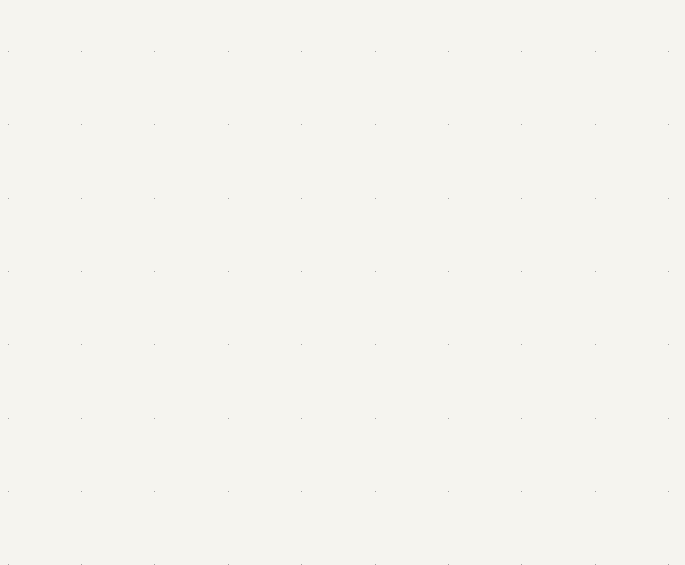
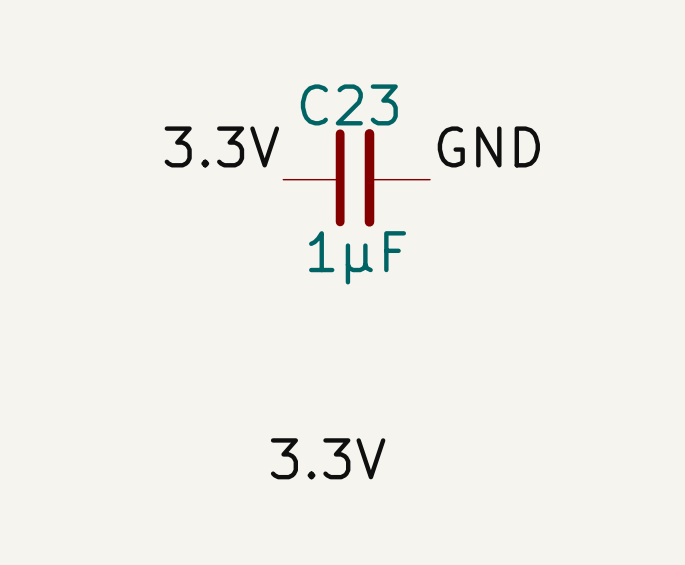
label: none -> 3.3V (221, 146)
label: none -> GND (488, 146)
C23: none -> (356, 177)
label: none -> 3.3V (328, 458)

